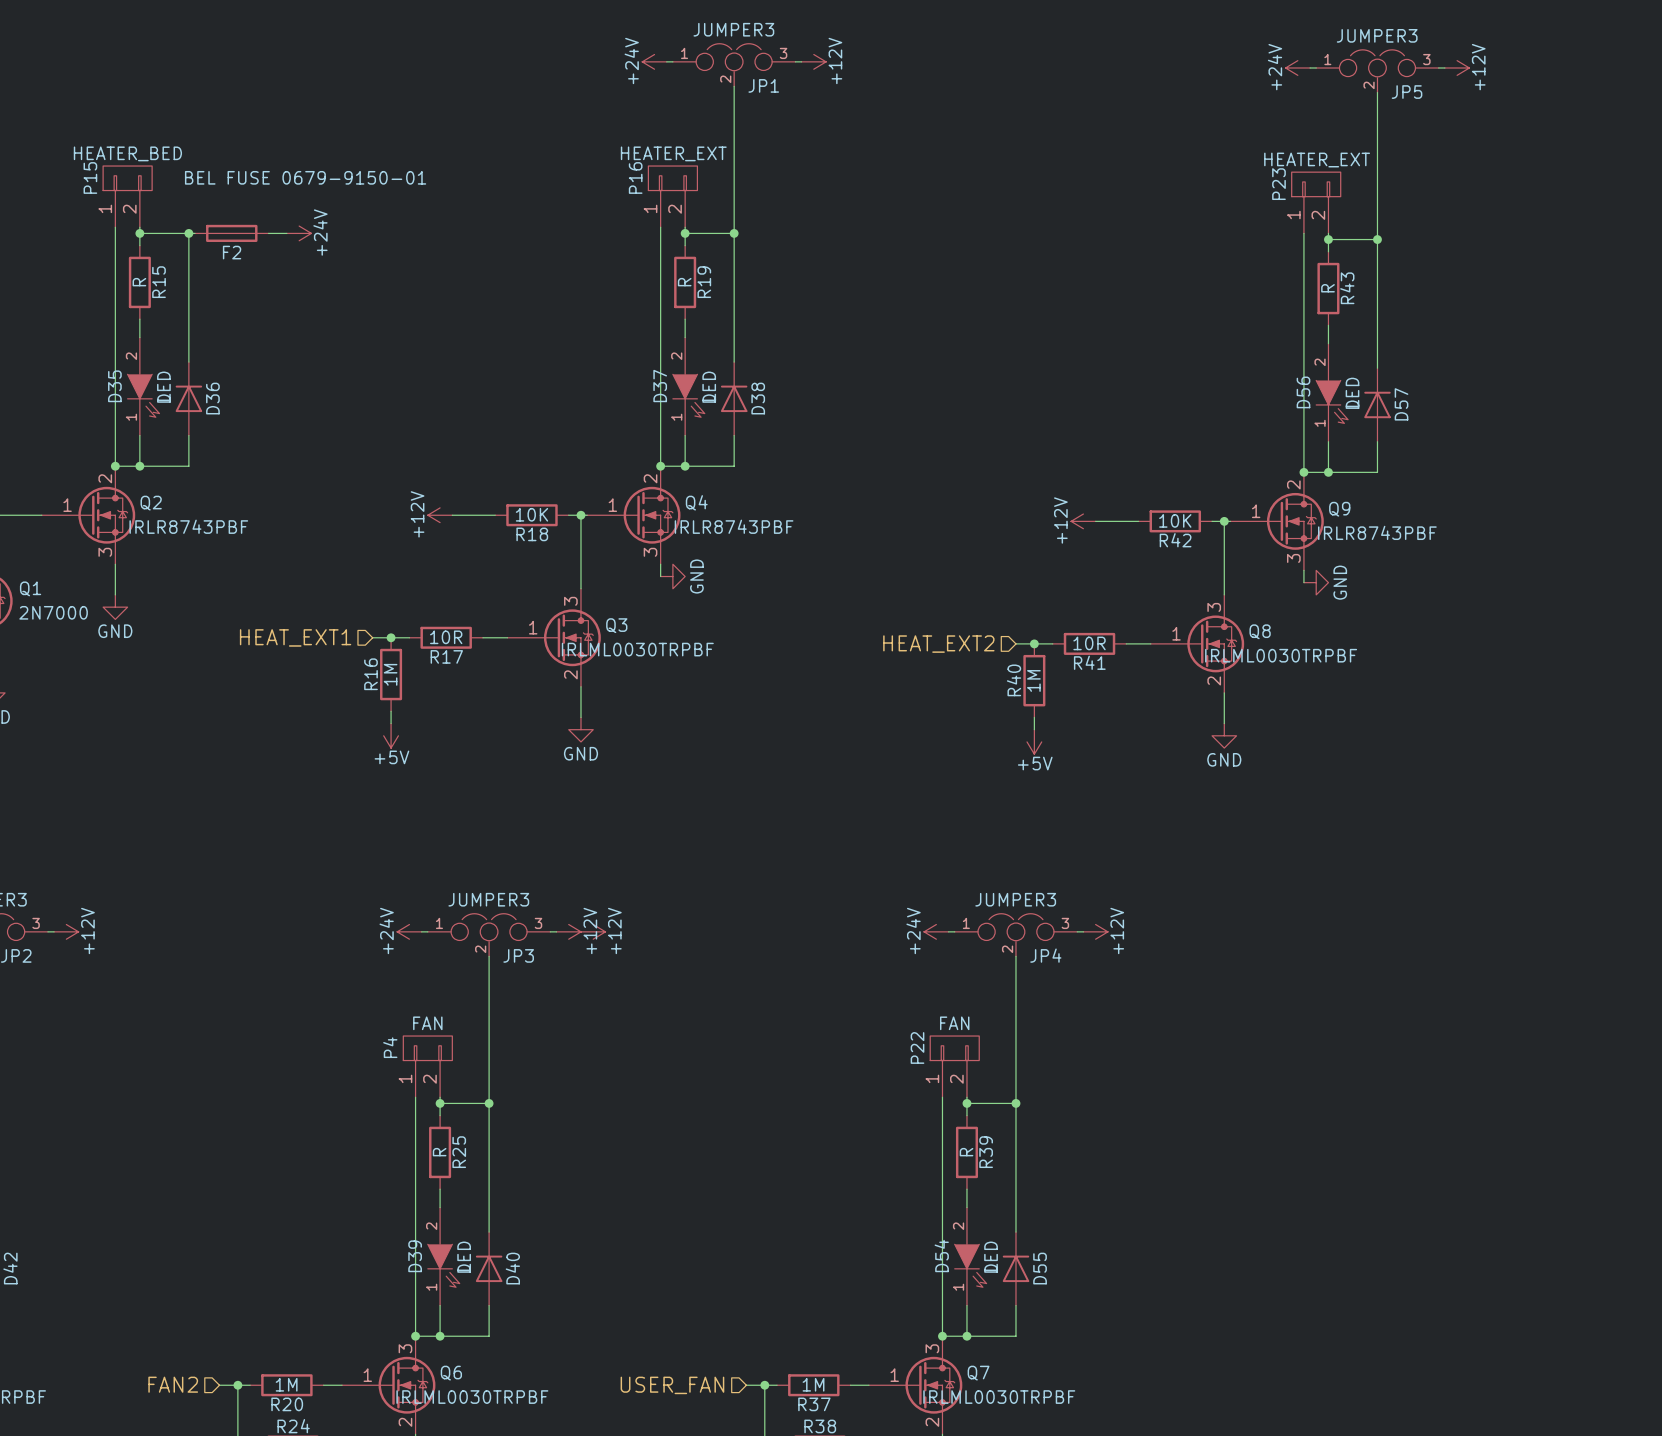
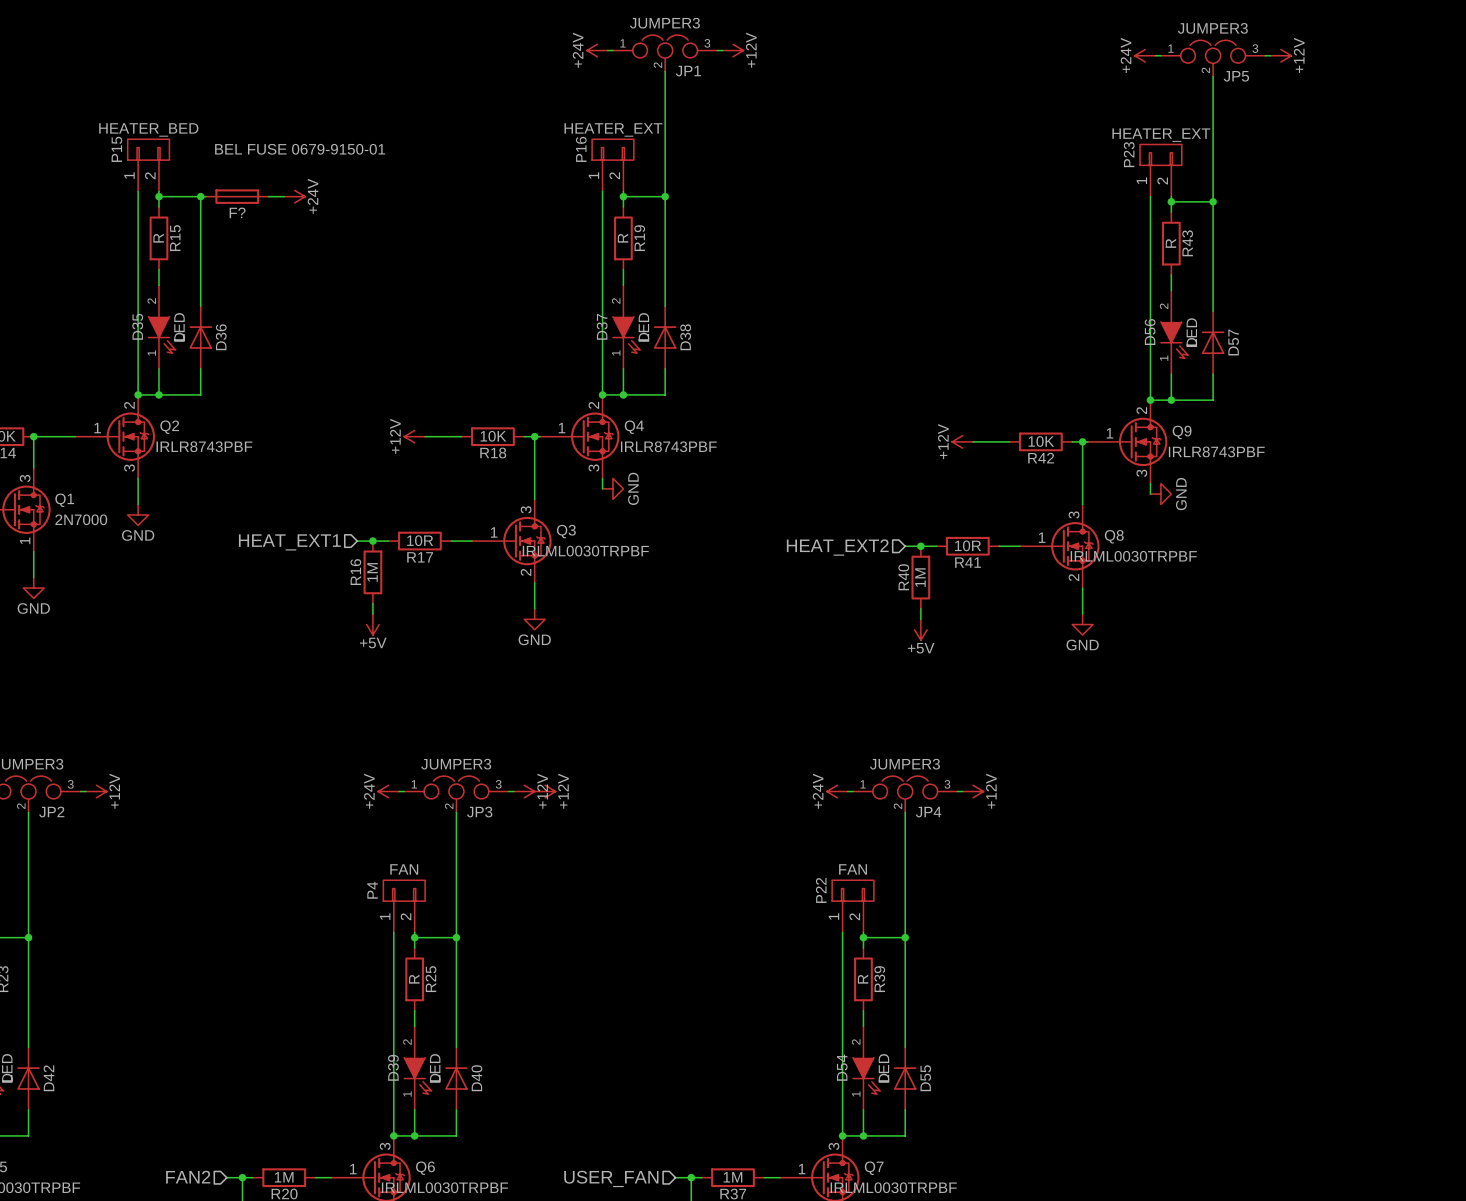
F2 name: F2 (232, 252) -> F? (237, 212)

